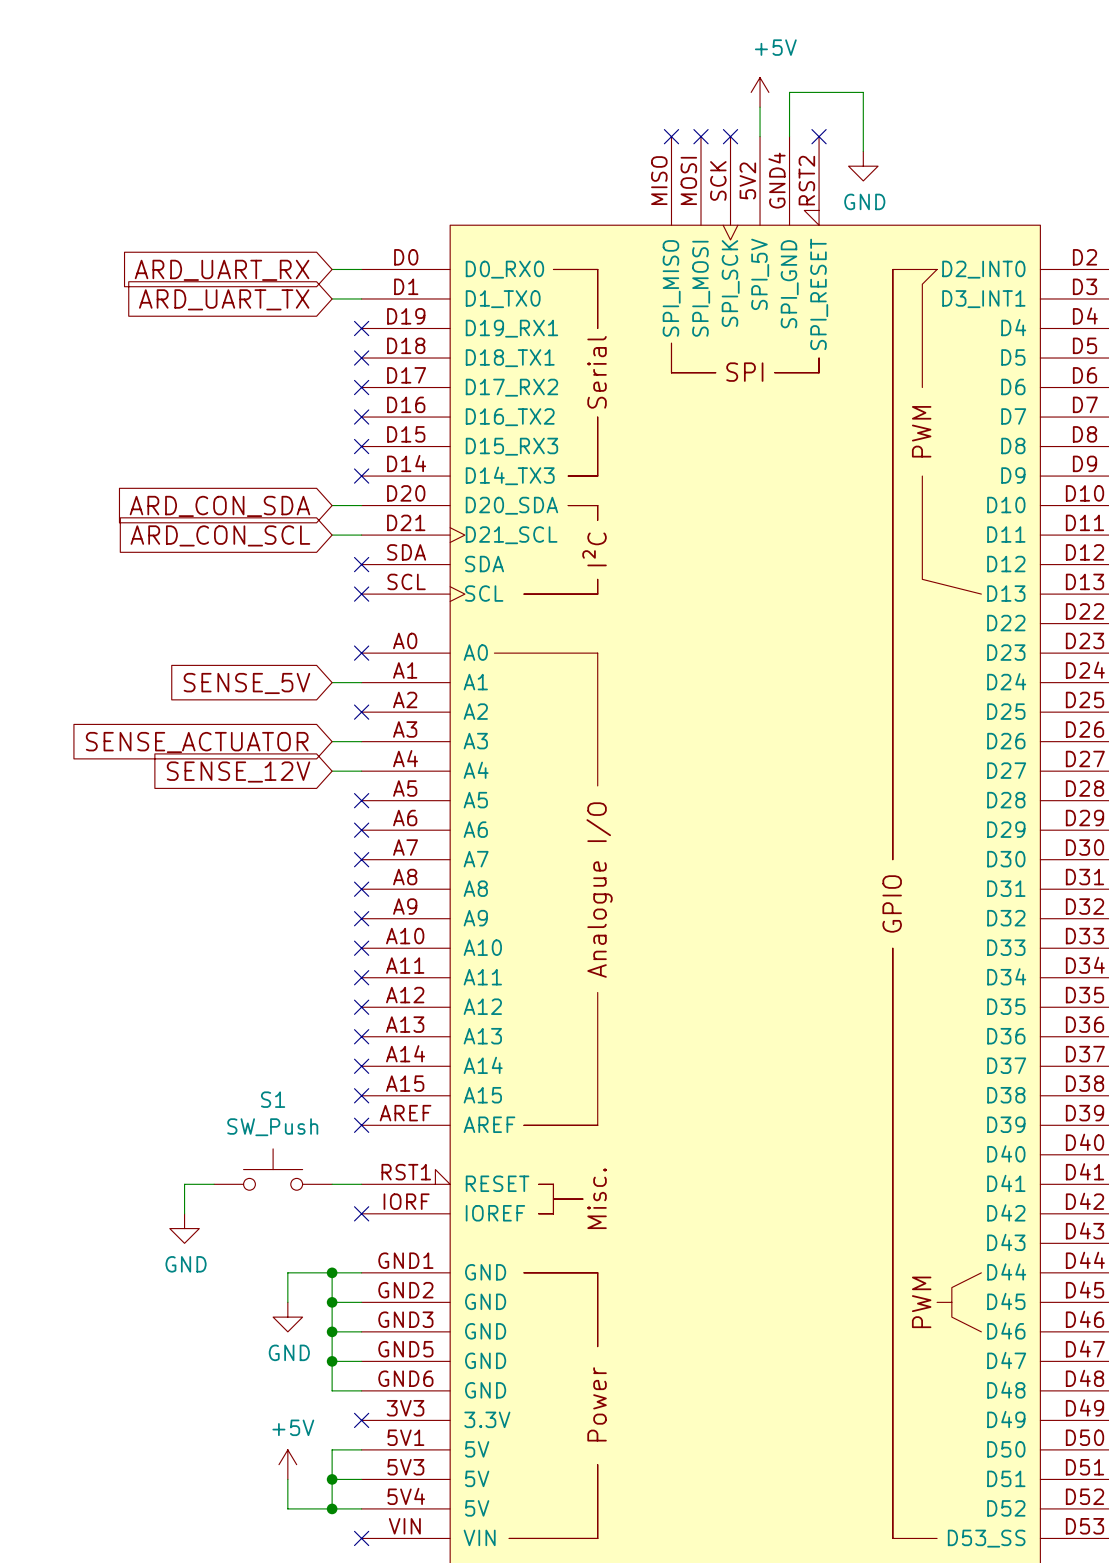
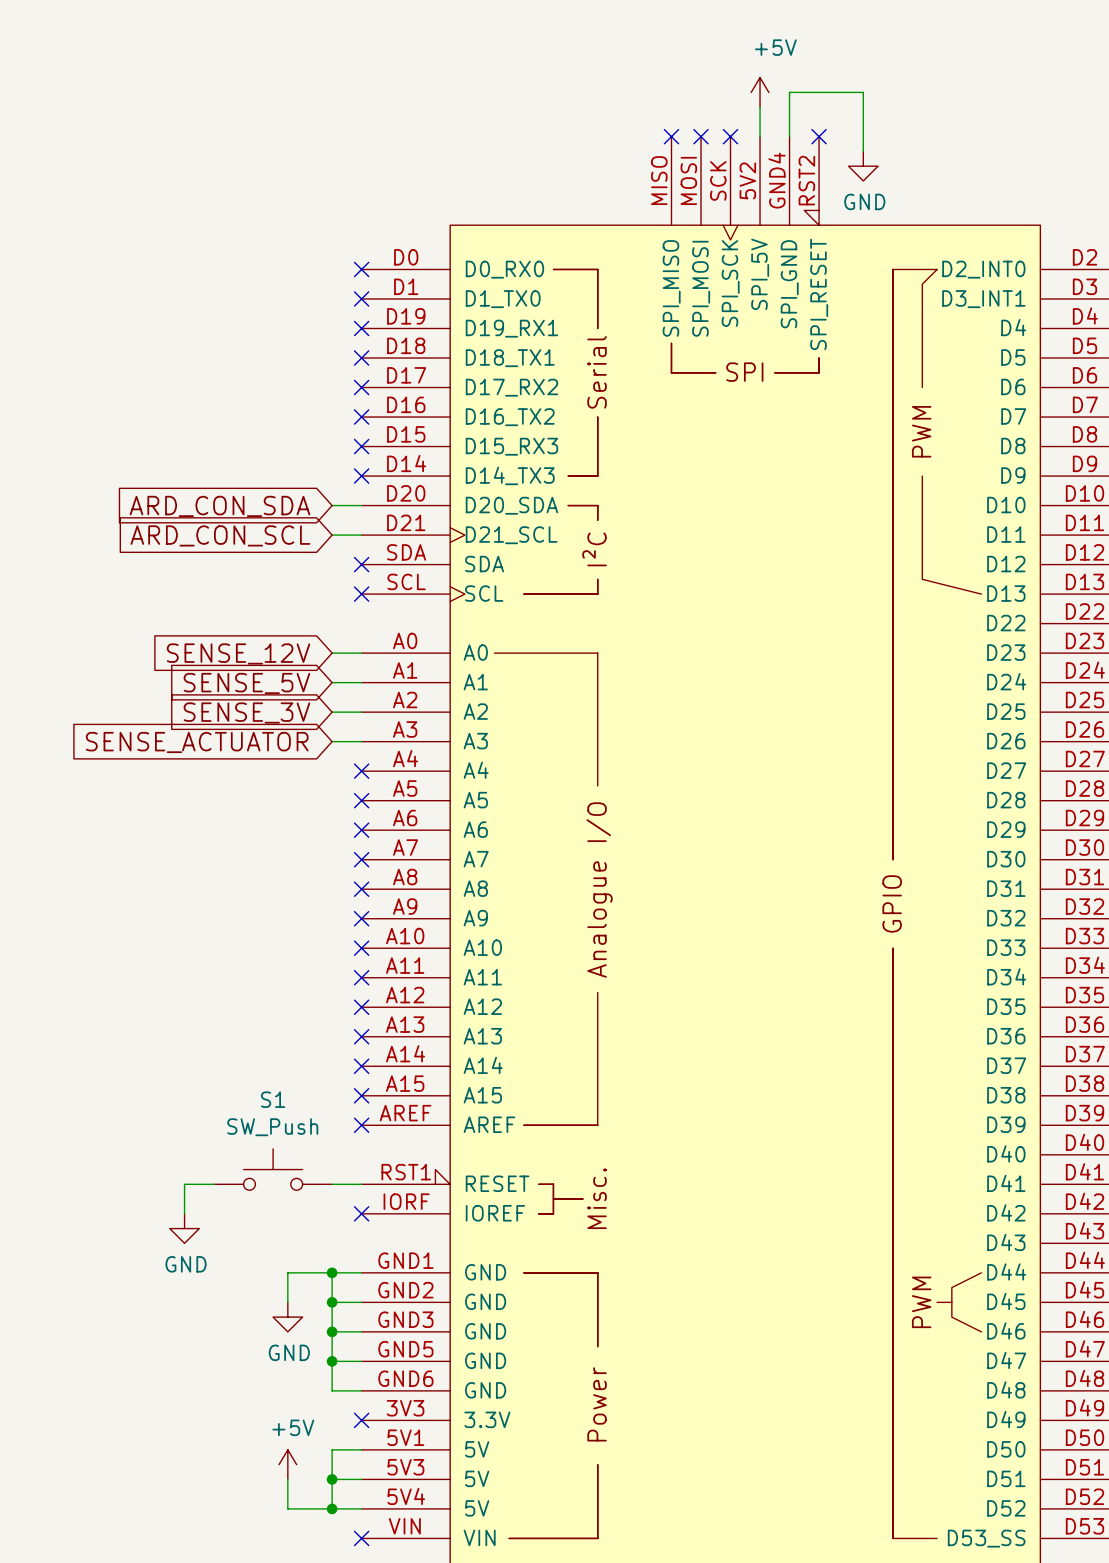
wire: (332, 269) (361, 269) -> none
no-connect mark: none -> (361, 269)
global label: ARD_UART_RX (222, 270) -> none
wire: (332, 298) (361, 298) -> none
no-connect mark: none -> (361, 298)
global label: ARD_UART_TX (224, 299) -> none
wire: none -> (332, 653) (361, 653)
no-connect mark: (361, 653) -> none
global label: none -> SENSE_3V (246, 712)
no-connect mark: (361, 712) -> none
wire: (332, 771) (361, 771) -> (332, 712) (361, 712)
no-connect mark: none -> (361, 771)
global label position: SENSE_12V (238, 772) -> SENSE_12V (238, 653)

